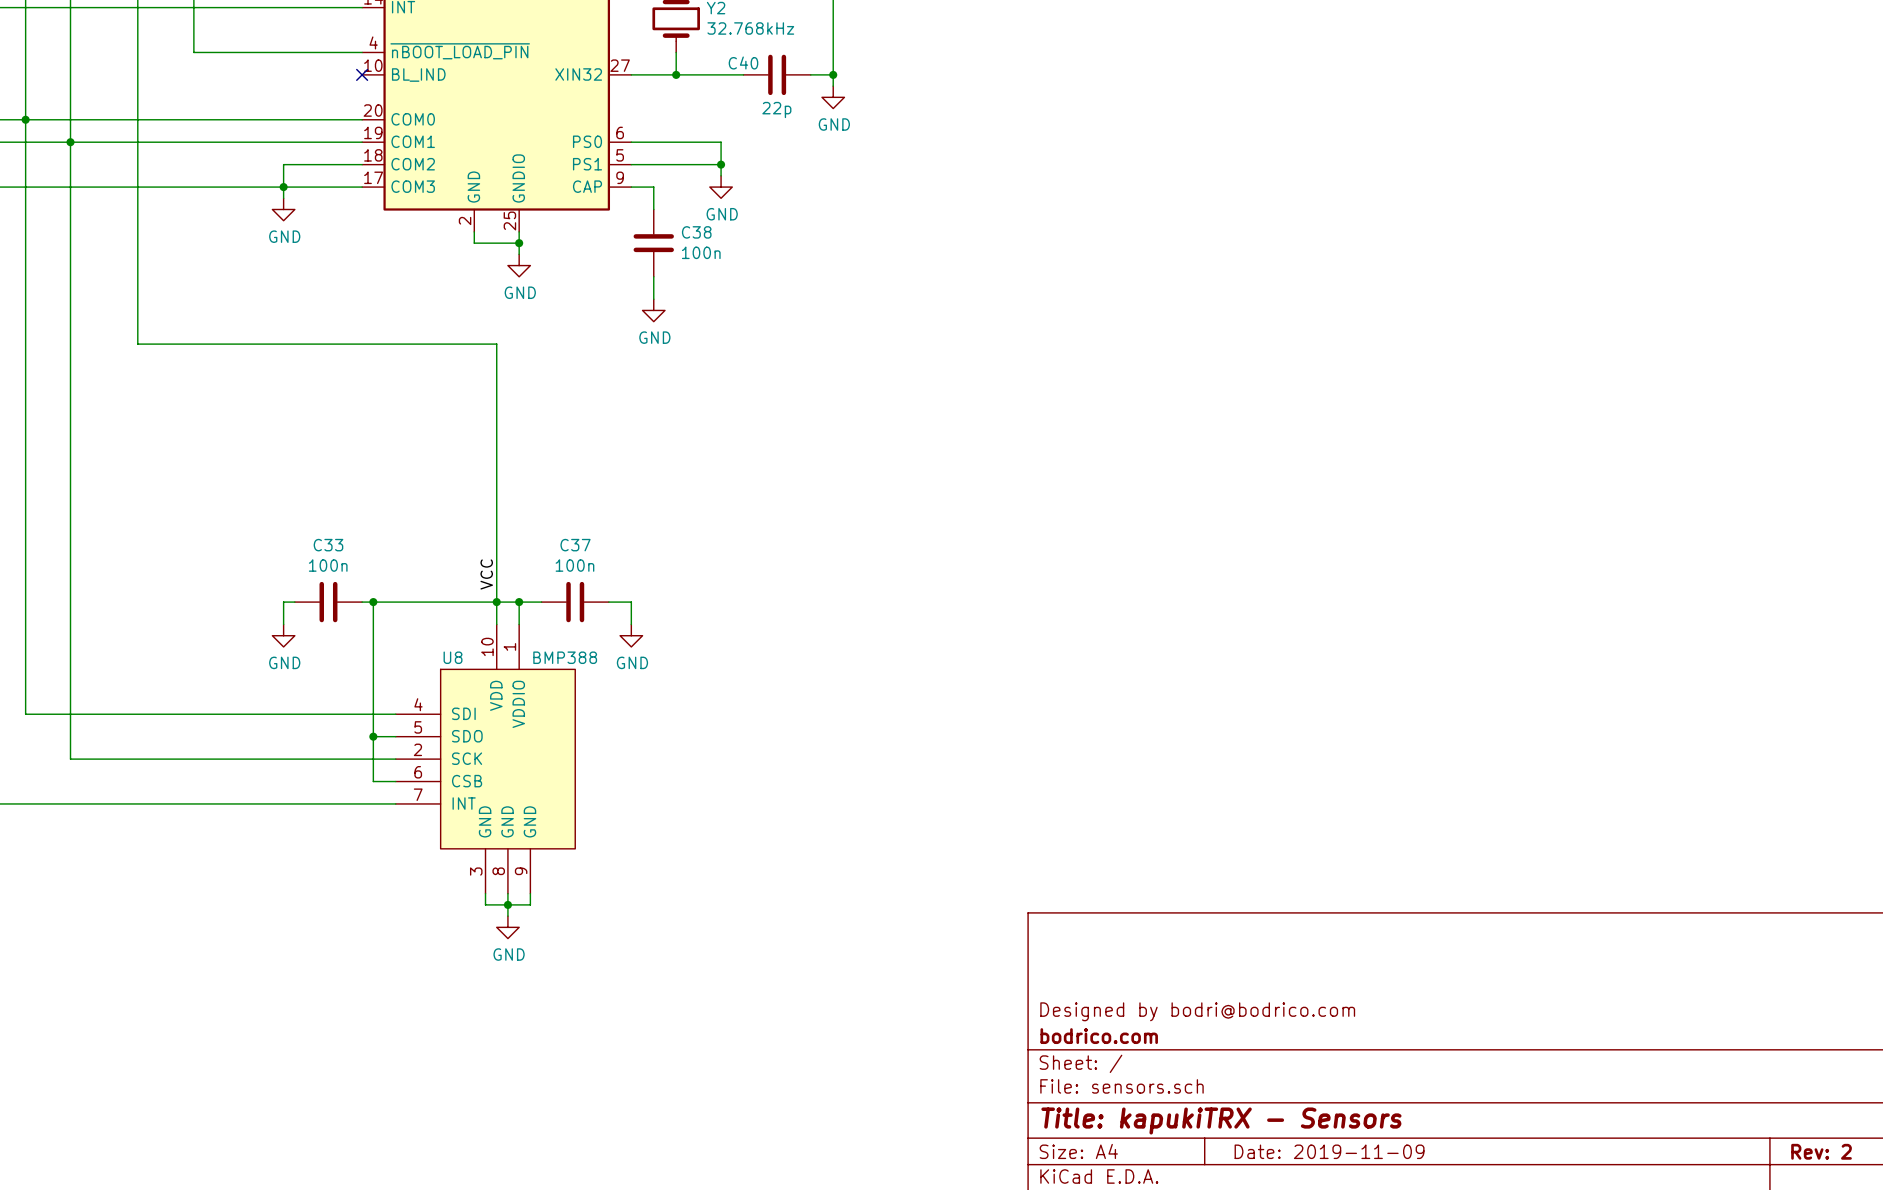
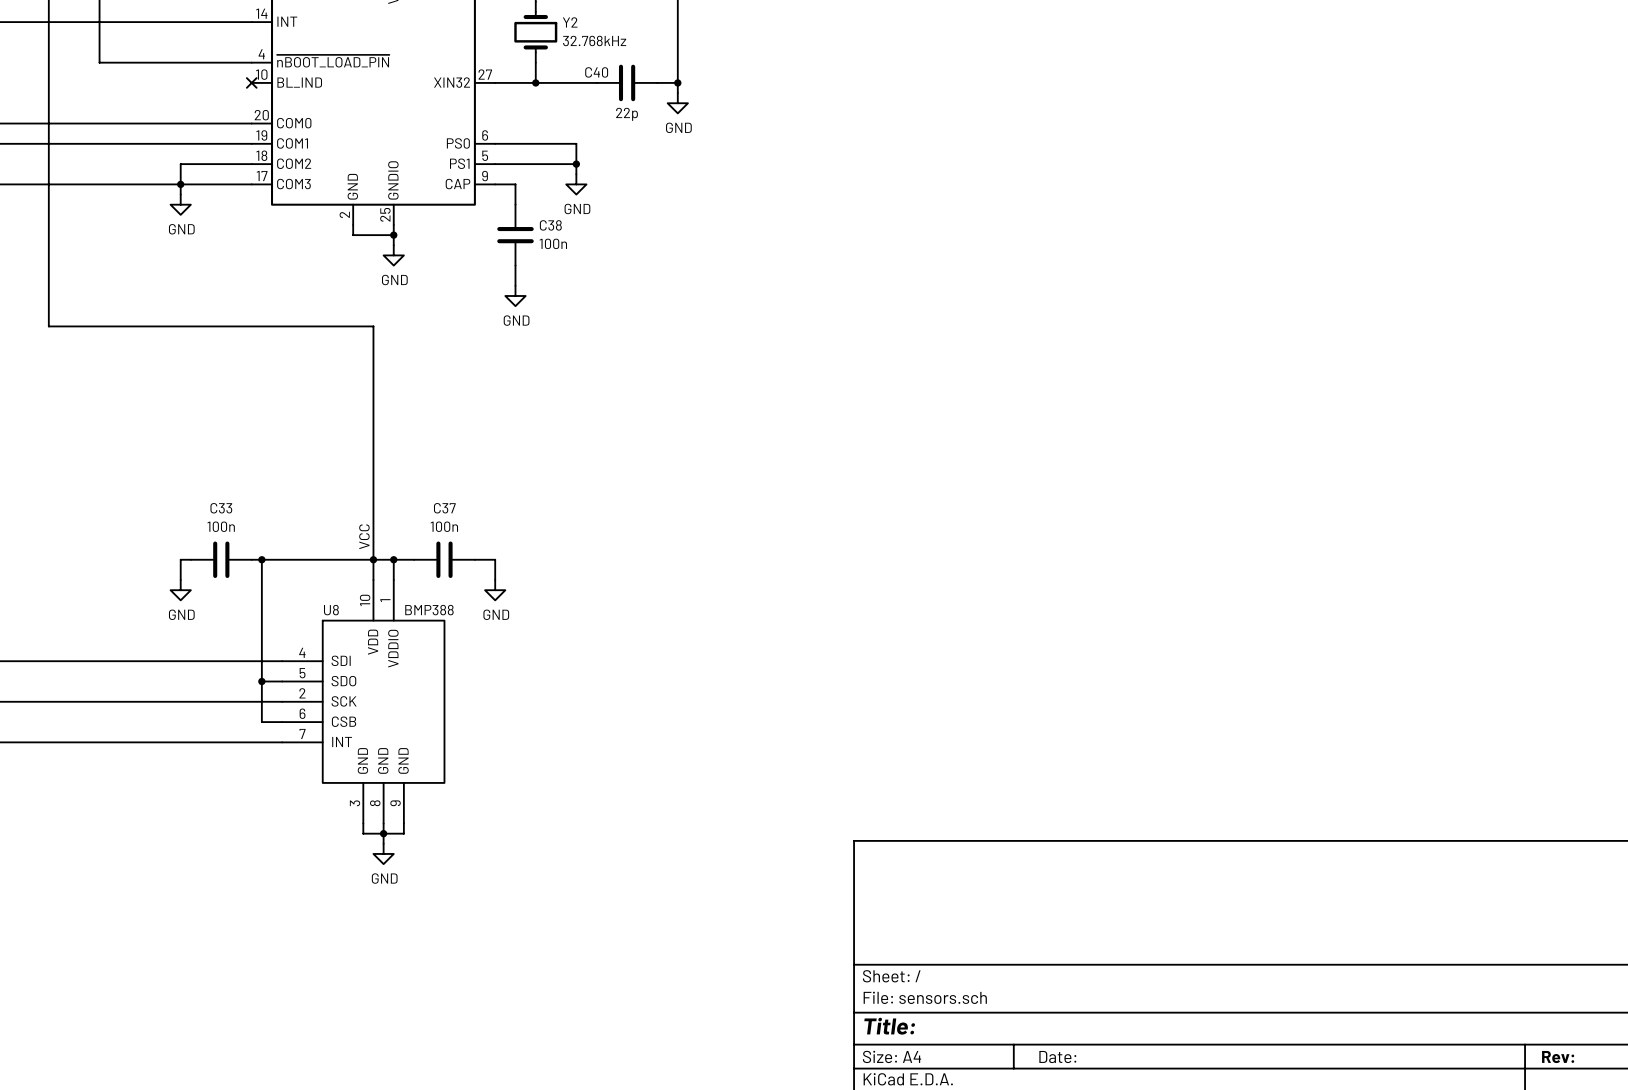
title block: Designed by bodri@bodrico.com (1197, 1011) -> none
title block: bodrico.com (1099, 1036) -> none
title block: Title: kapukiTRX - Sensors (1221, 1120) -> Title: (889, 1026)
title block: Date: 2019-11-09 (1329, 1151) -> Date: (1057, 1057)
title block: Rev: 2 (1821, 1151) -> Rev: (1558, 1057)

